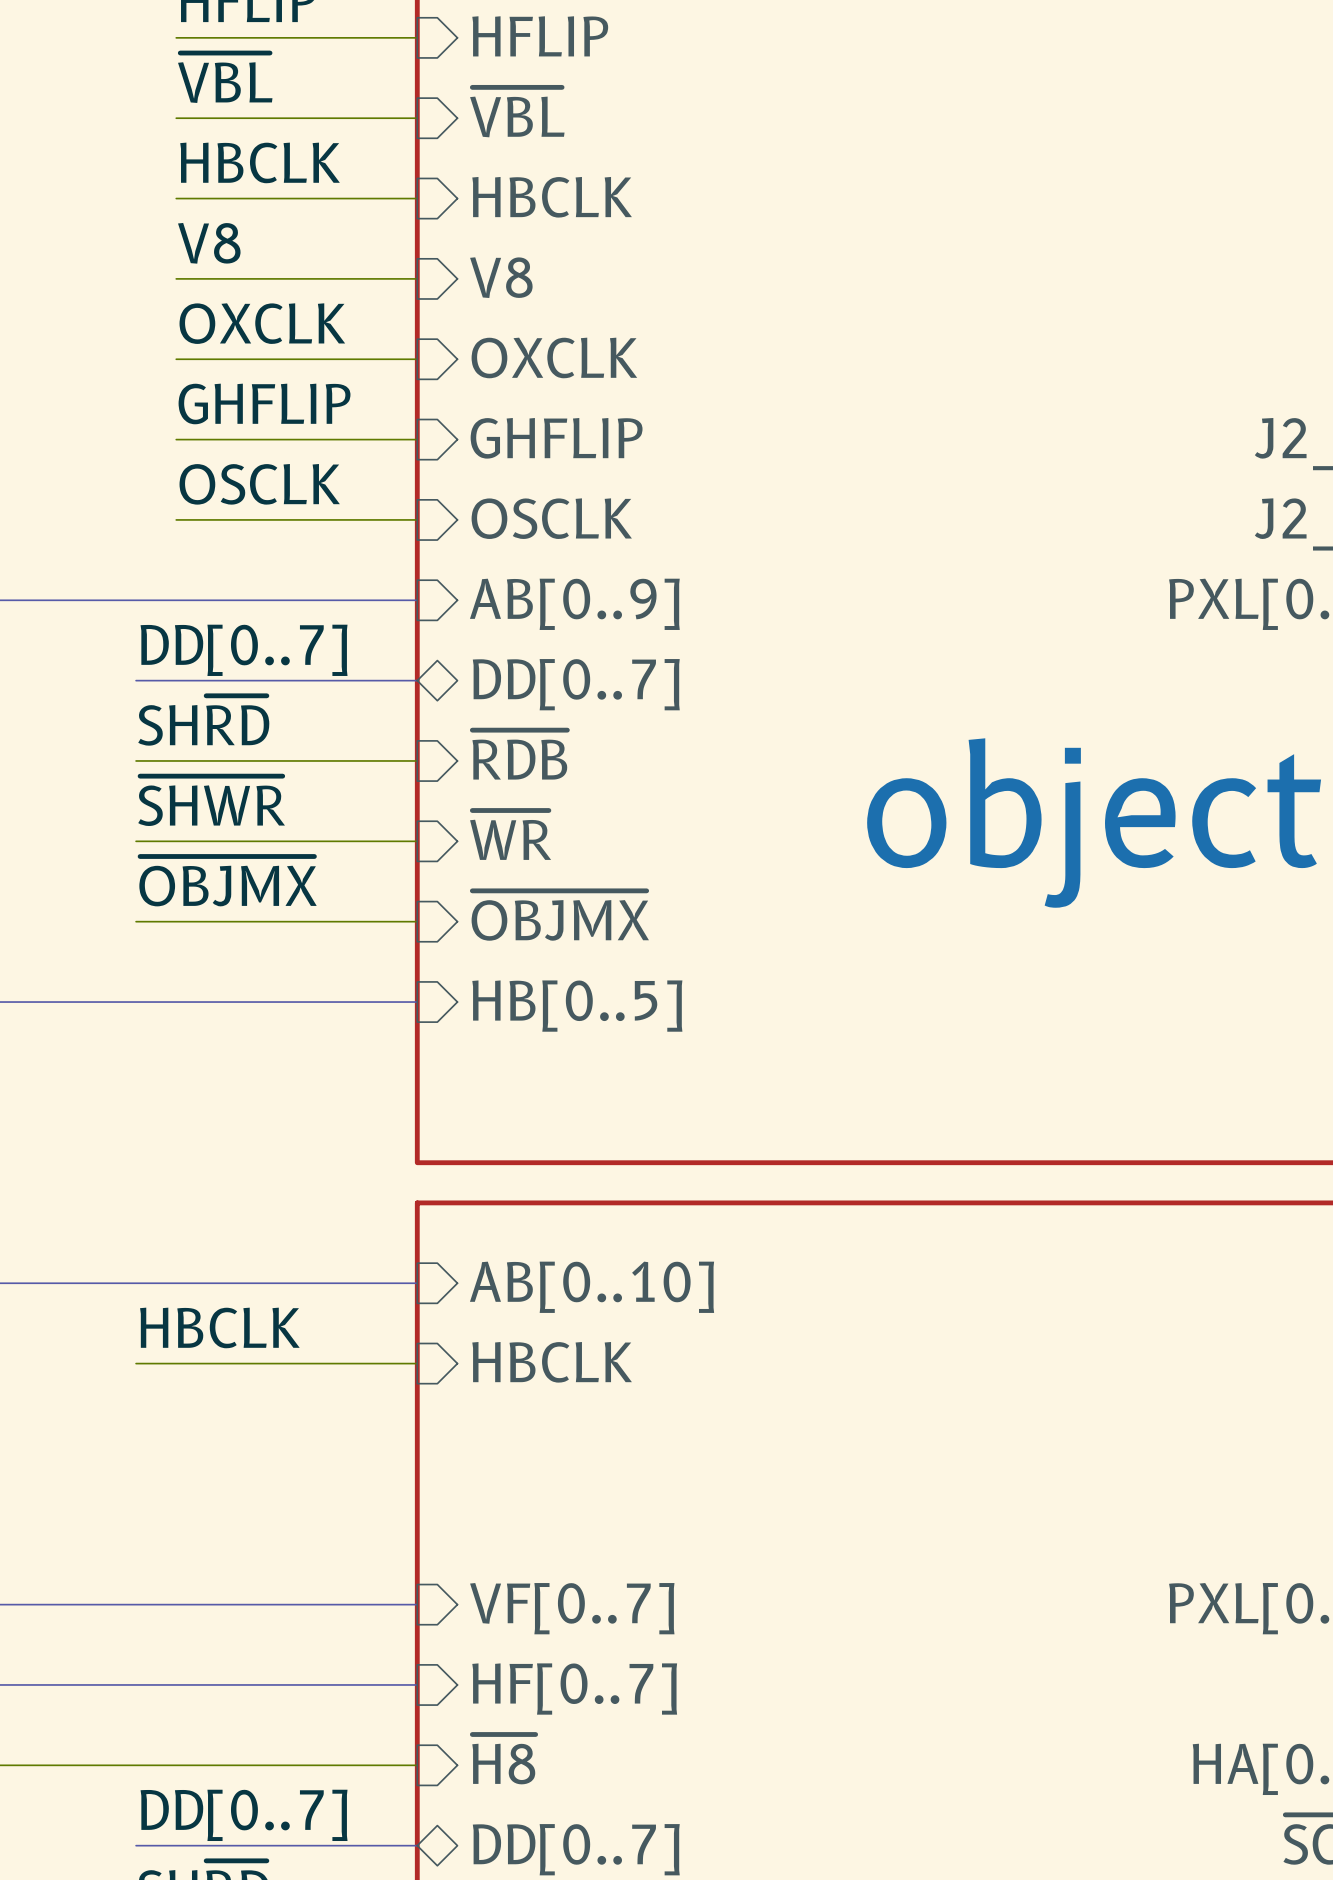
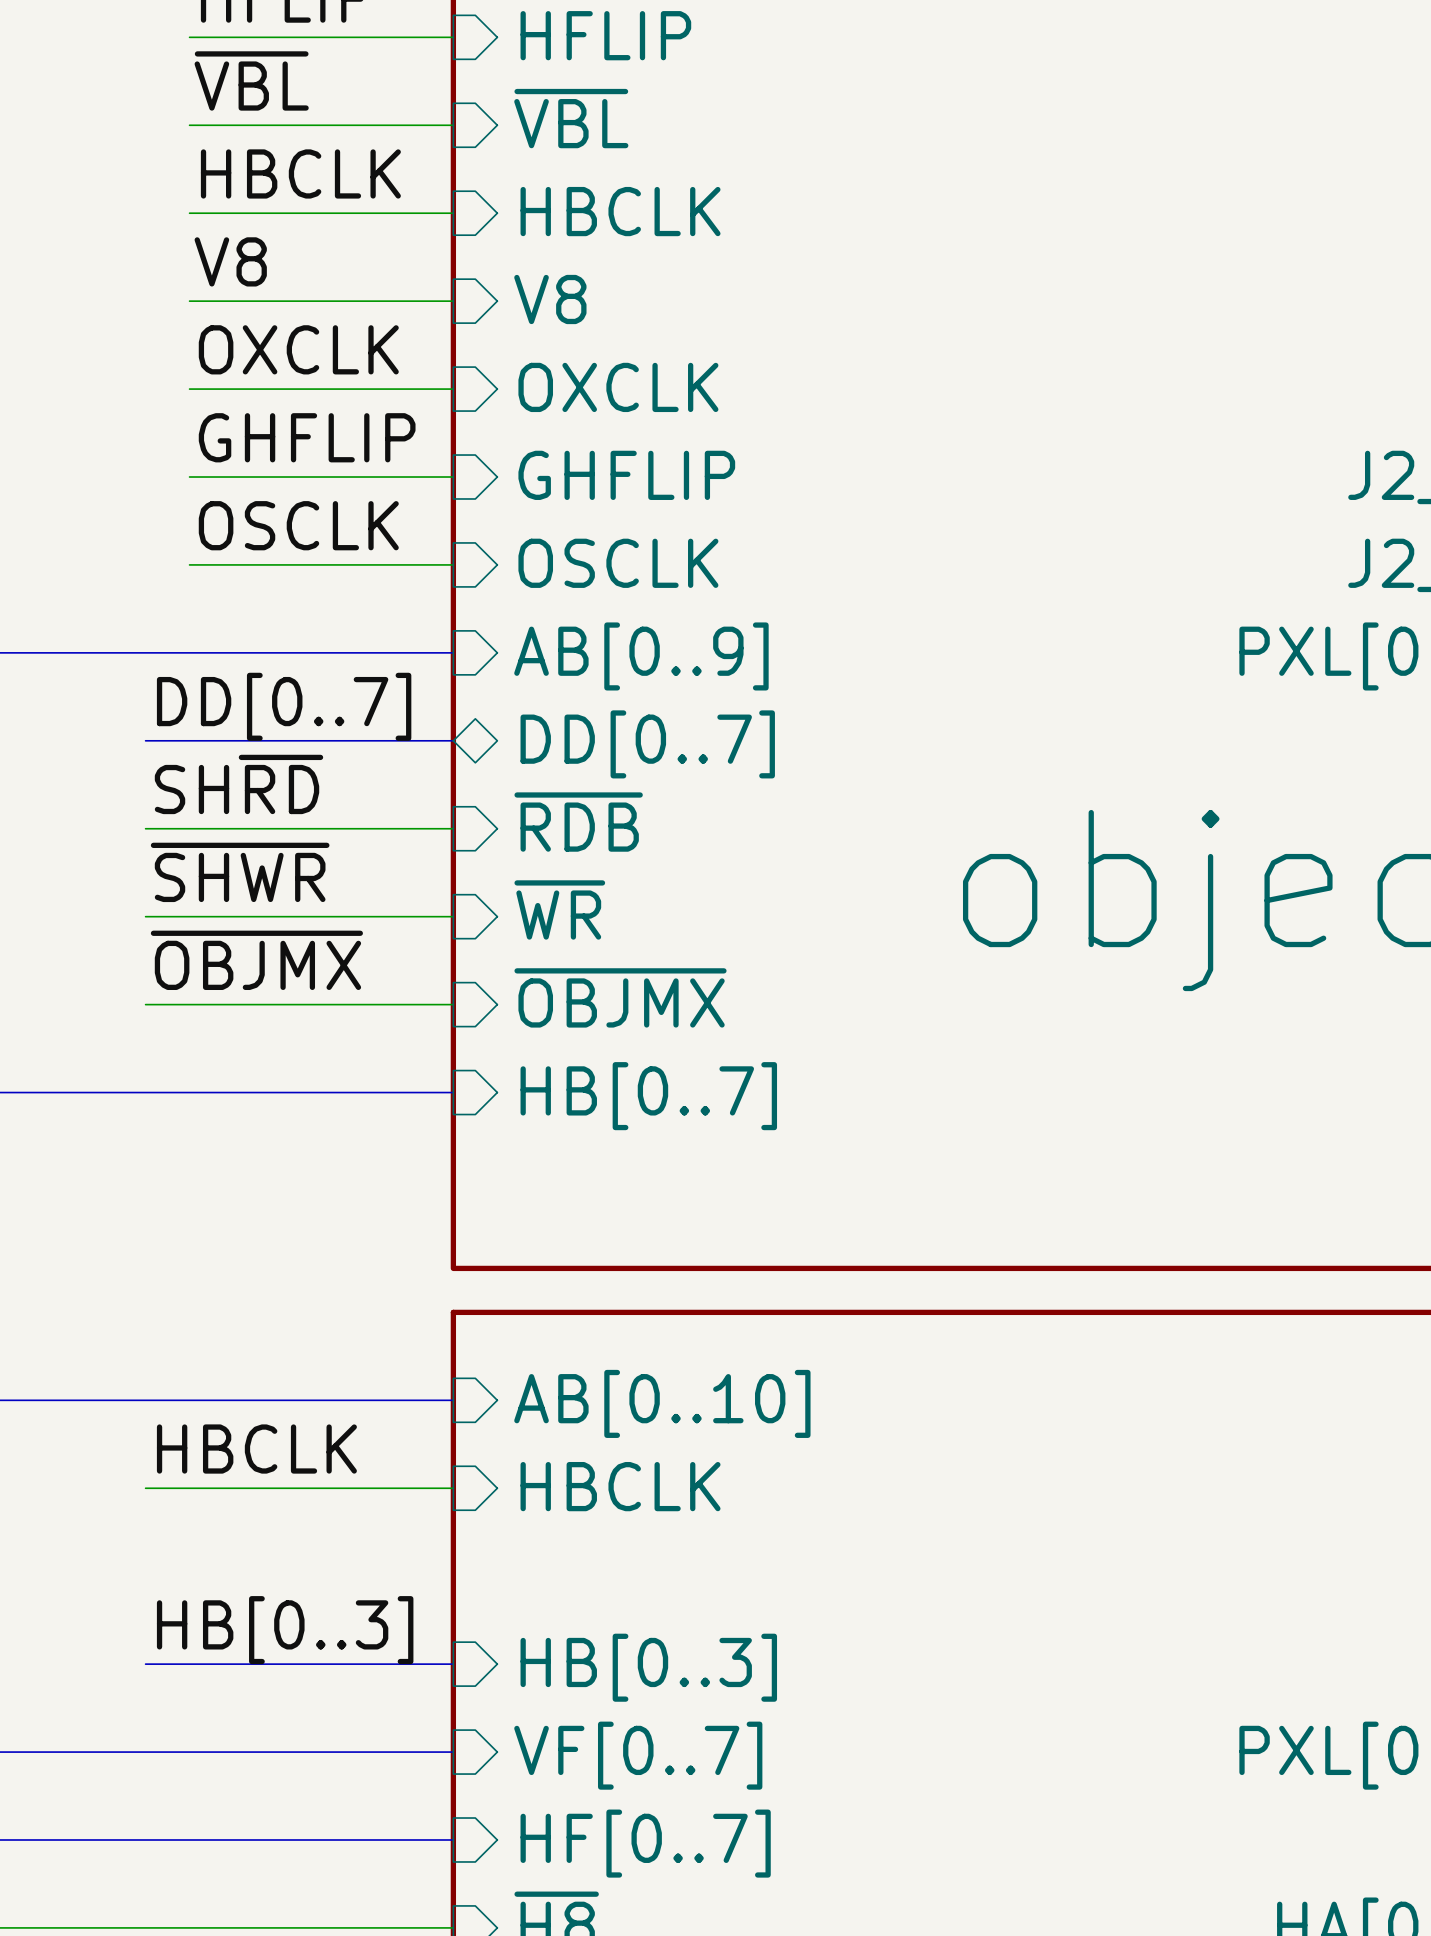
sheet pin: HB[0..5] (577, 1006) -> HB[0..7] (648, 1096)
label: none -> HB[0..3] (285, 1630)
bus: none -> (145, 1664) (453, 1664)
sheet pin: none -> HB[0..3] (648, 1667)

